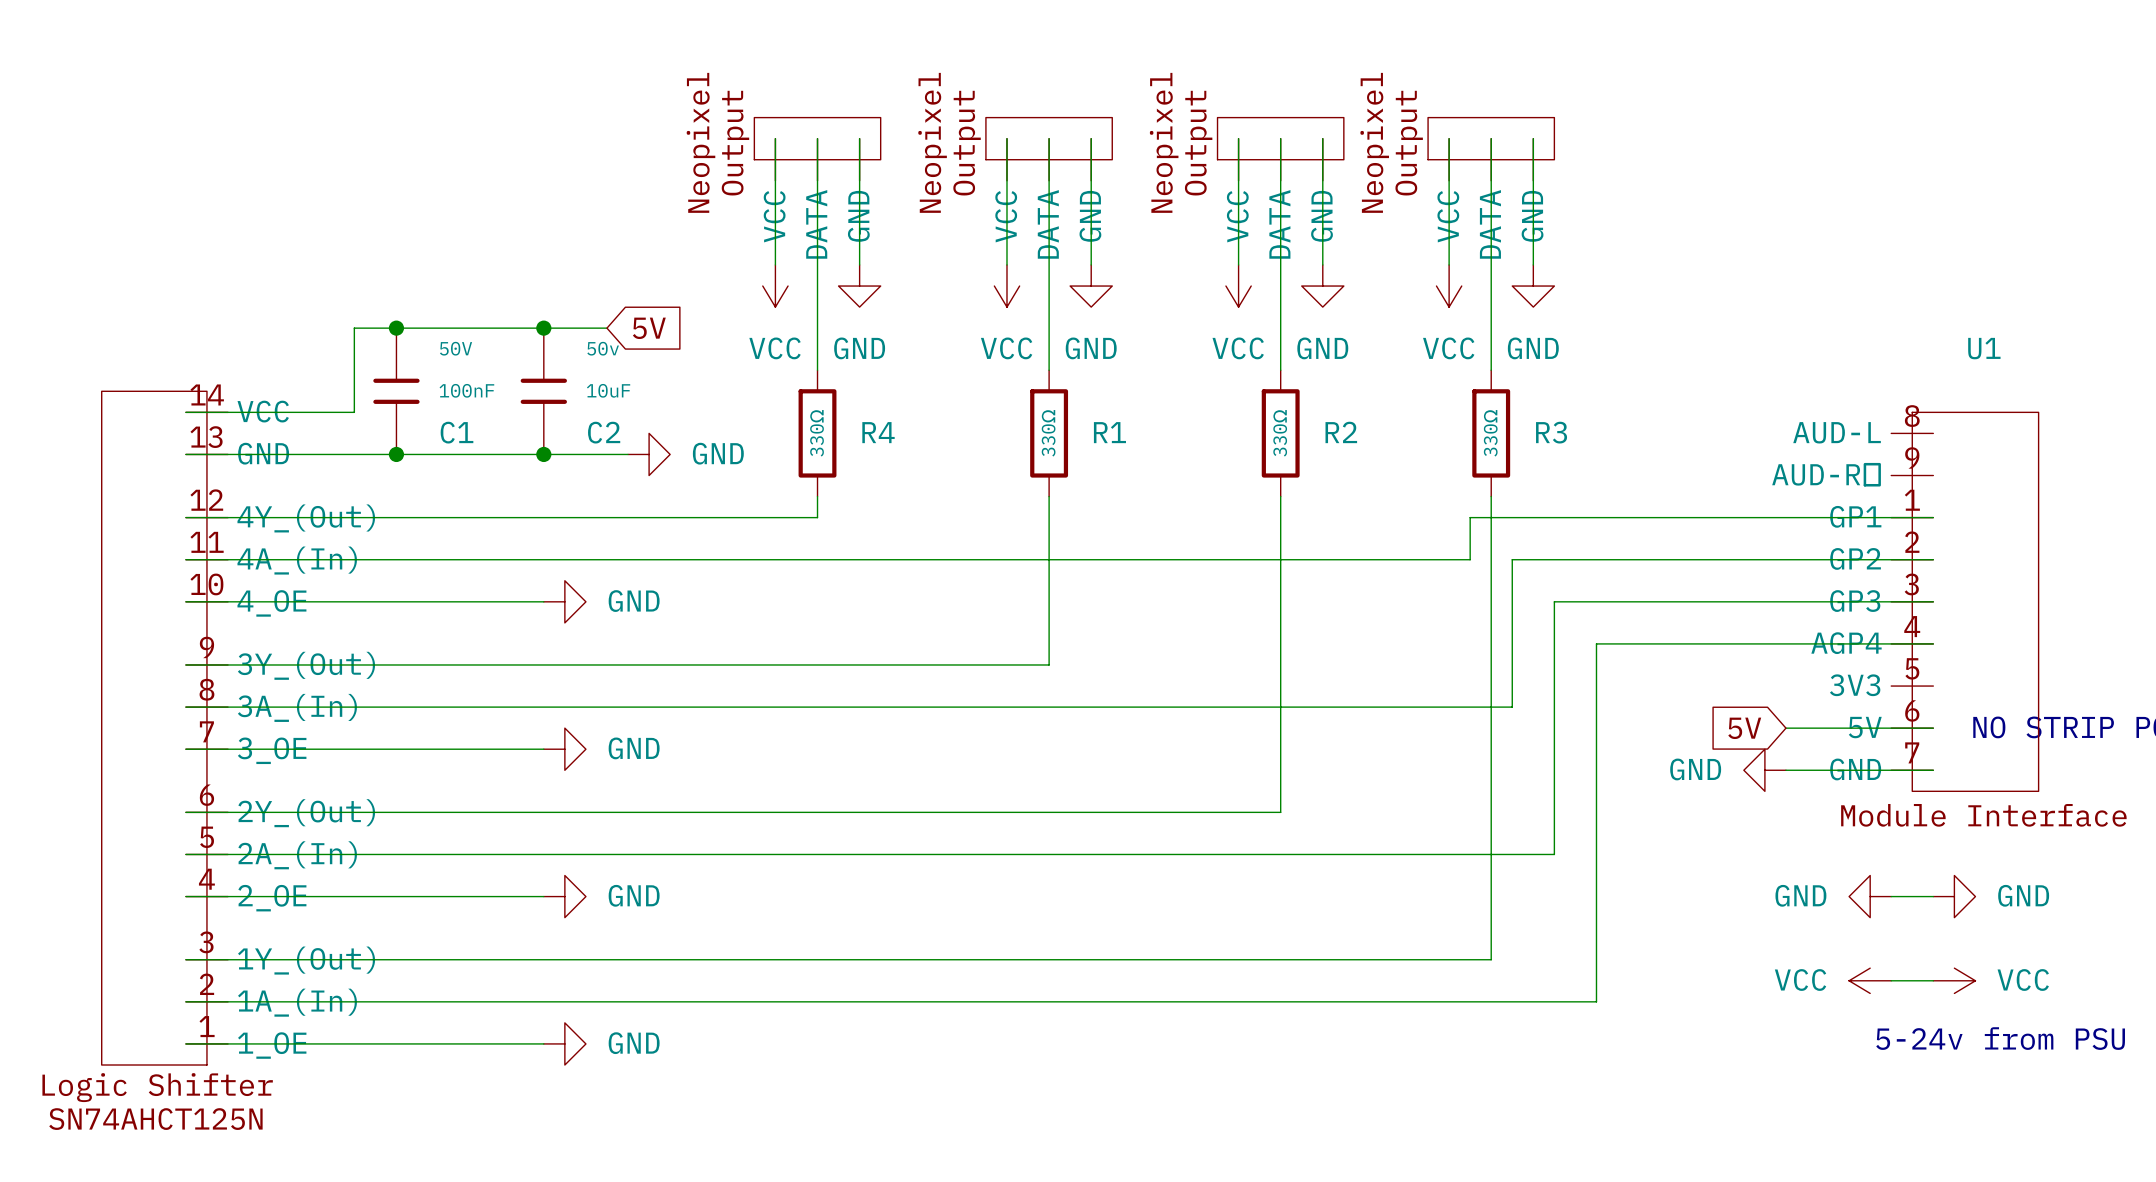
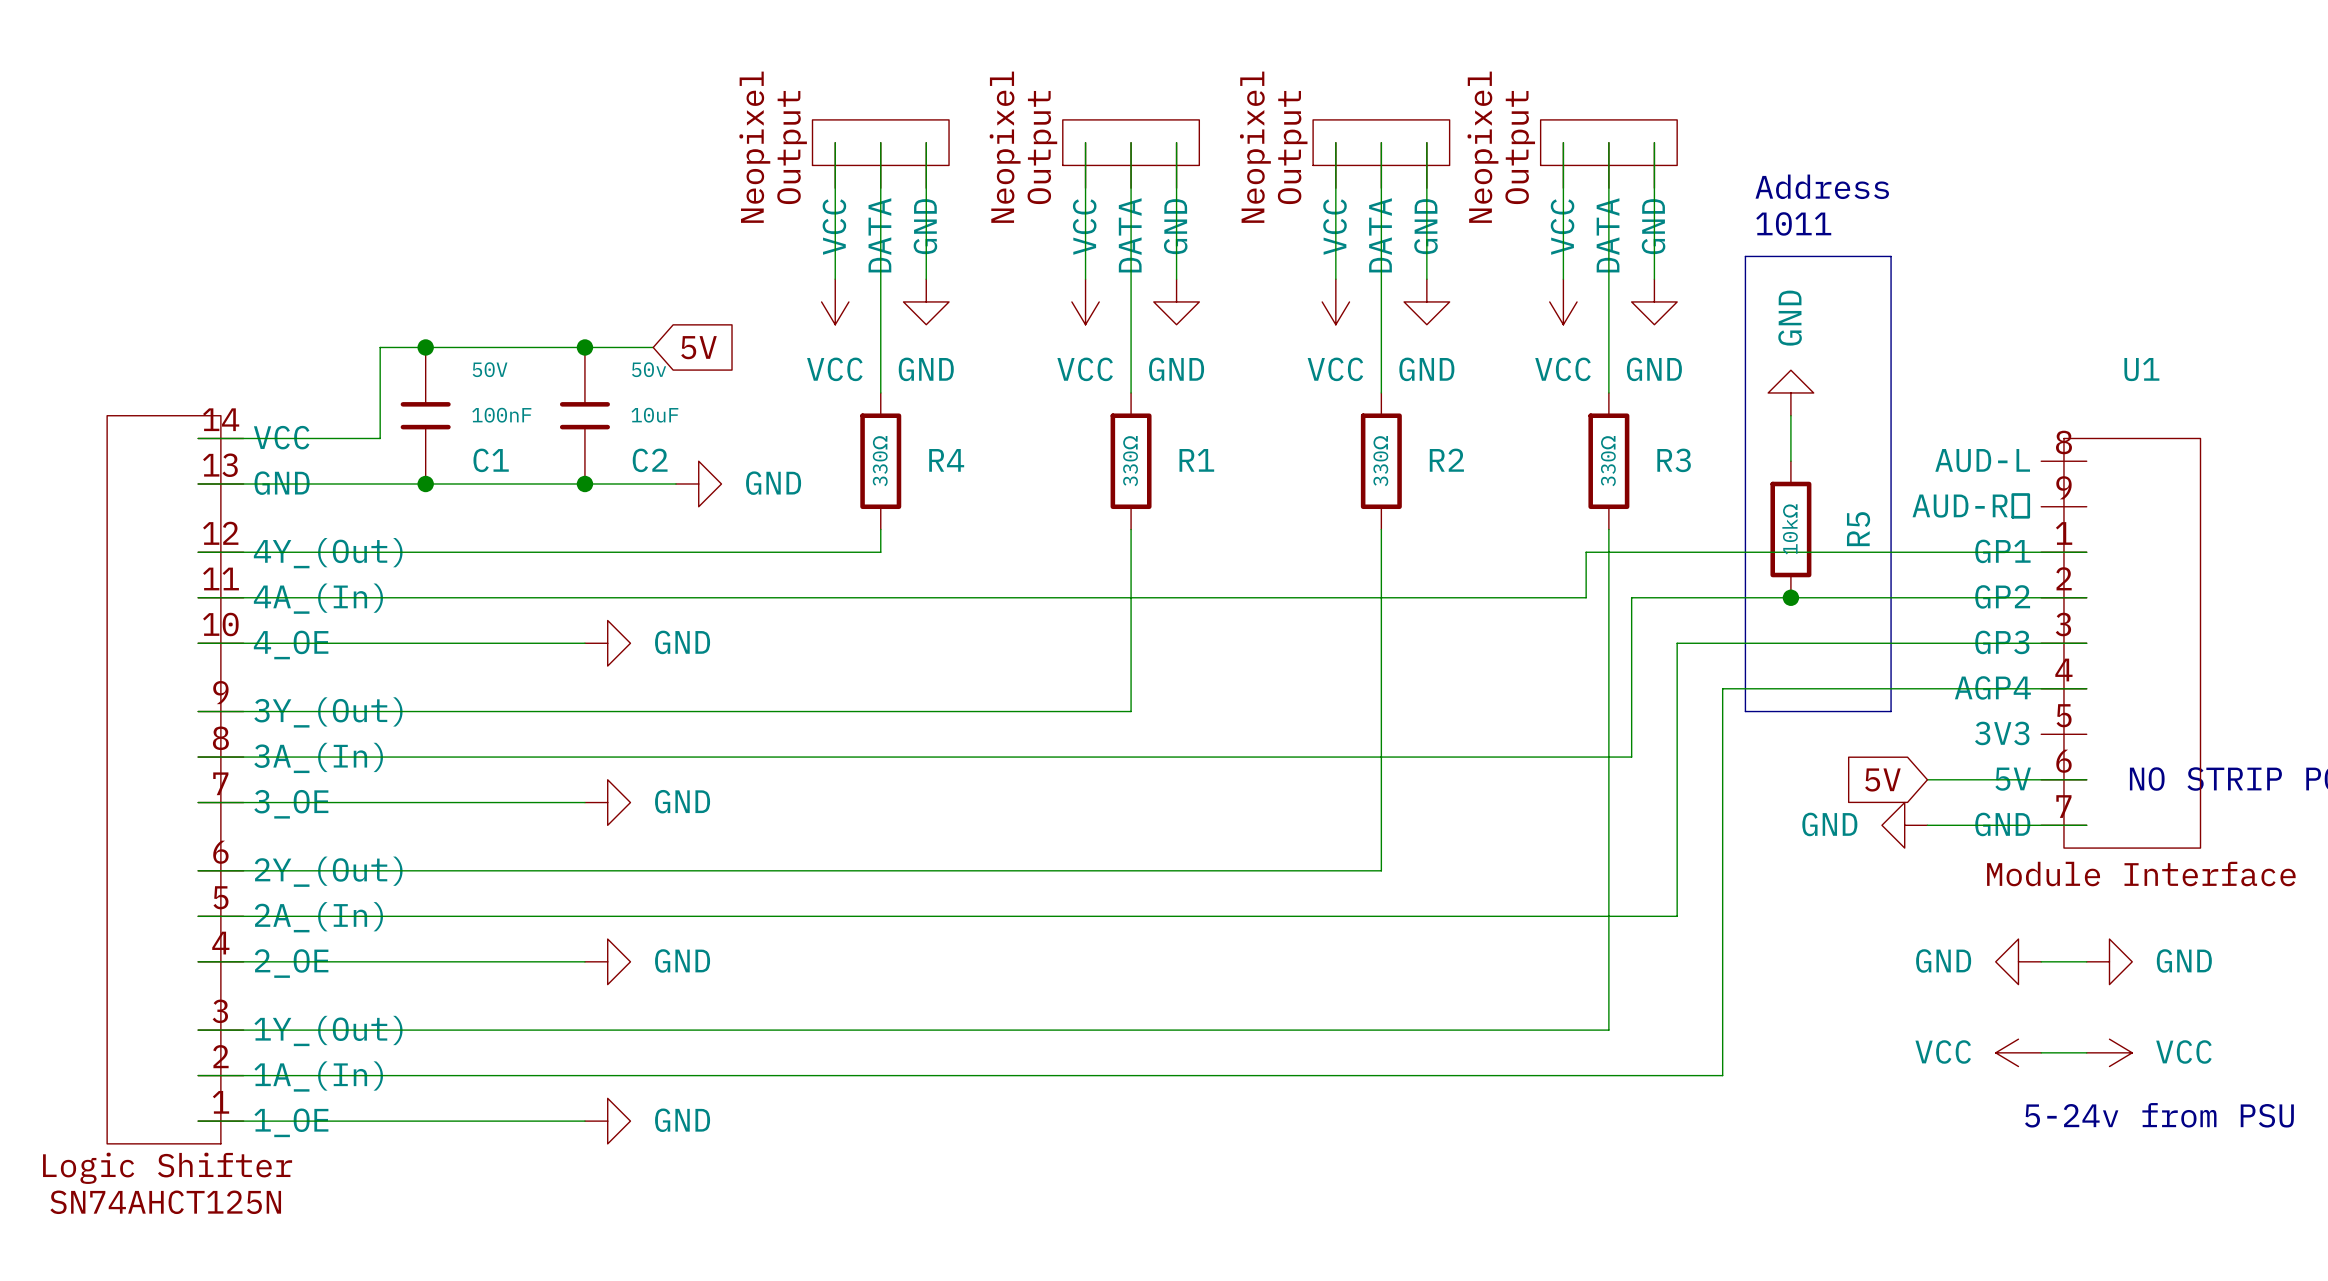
text: none -> Address (1822, 186)
text: none -> 1011 (1793, 223)
line: none -> (1745, 256) (1891, 256) (1891, 711) (1745, 711) (1745, 256)
power symbol: none -> GND (1790, 392)
wire: none -> (1790, 415) (1790, 461)
R5: none -> 10kΩ (1790, 529)
junction: none -> (1790, 597)

